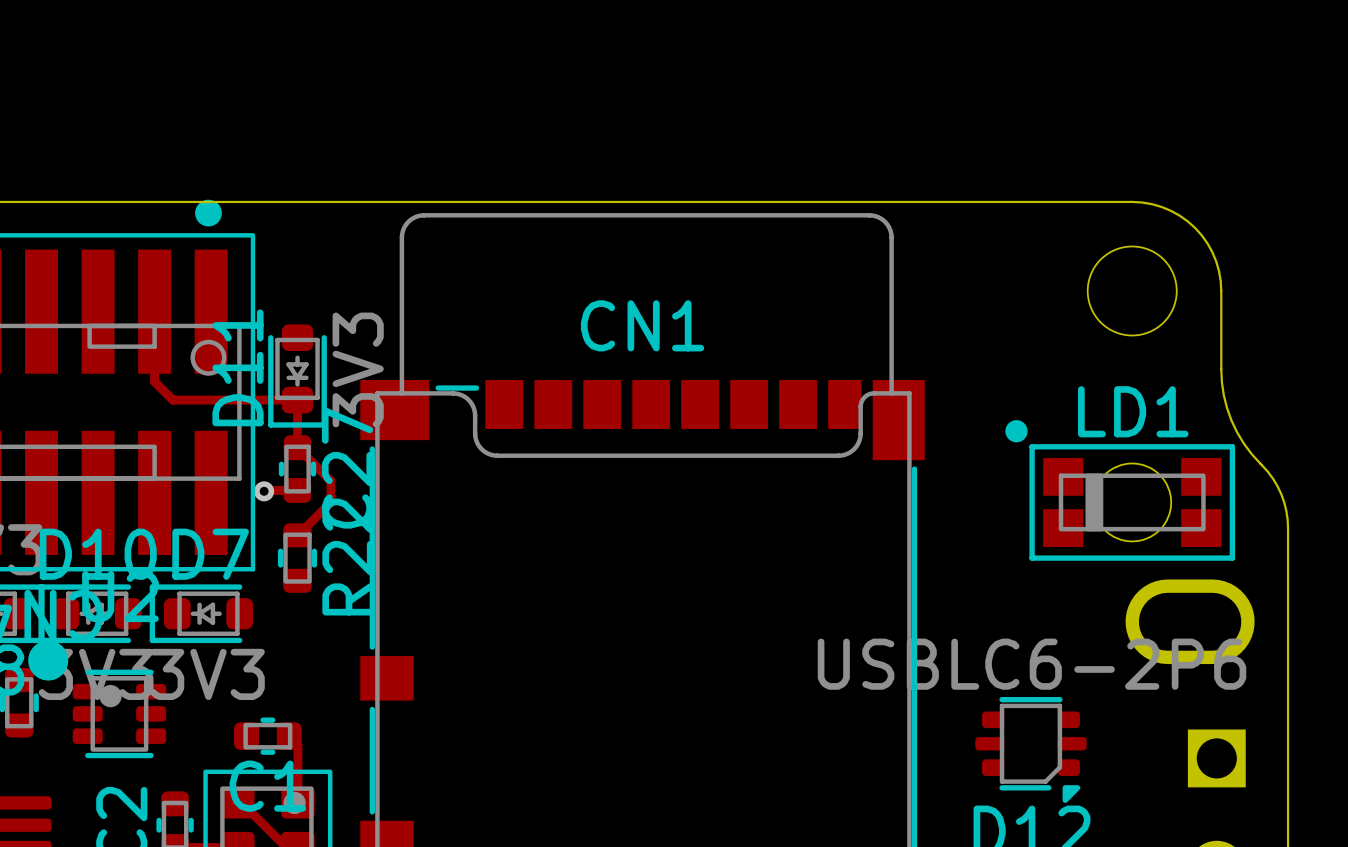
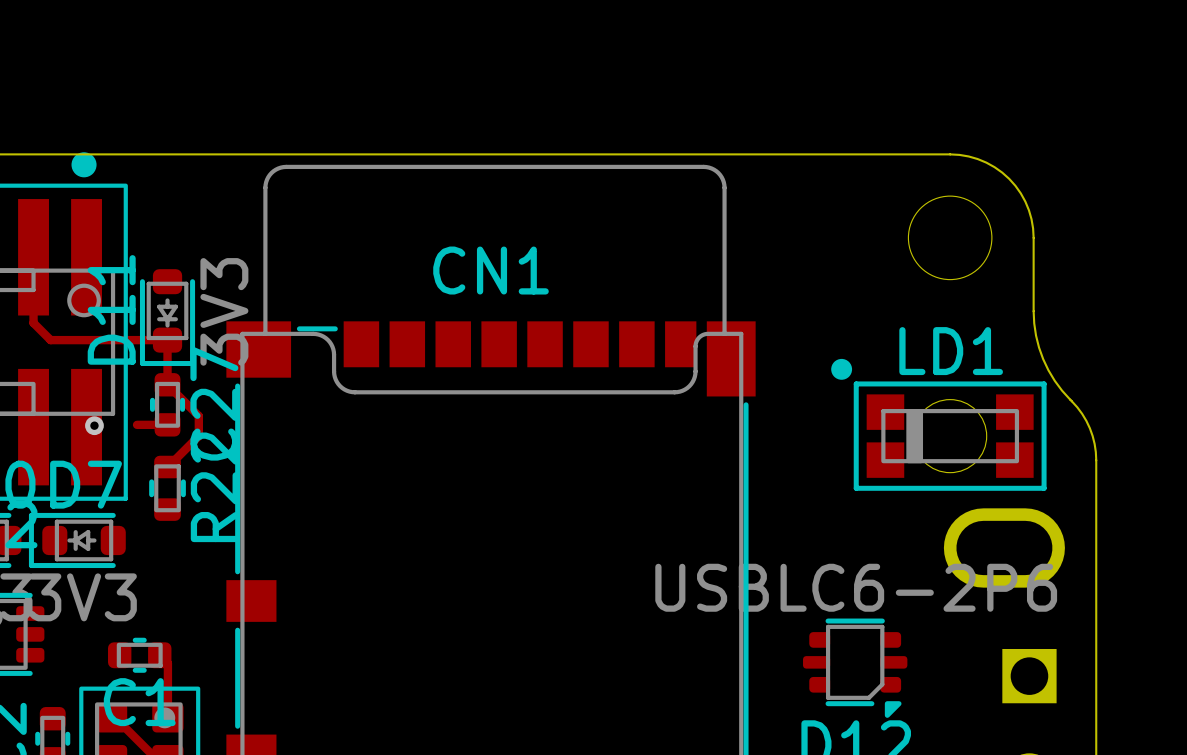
via position: (264, 491) -> (94, 425)

